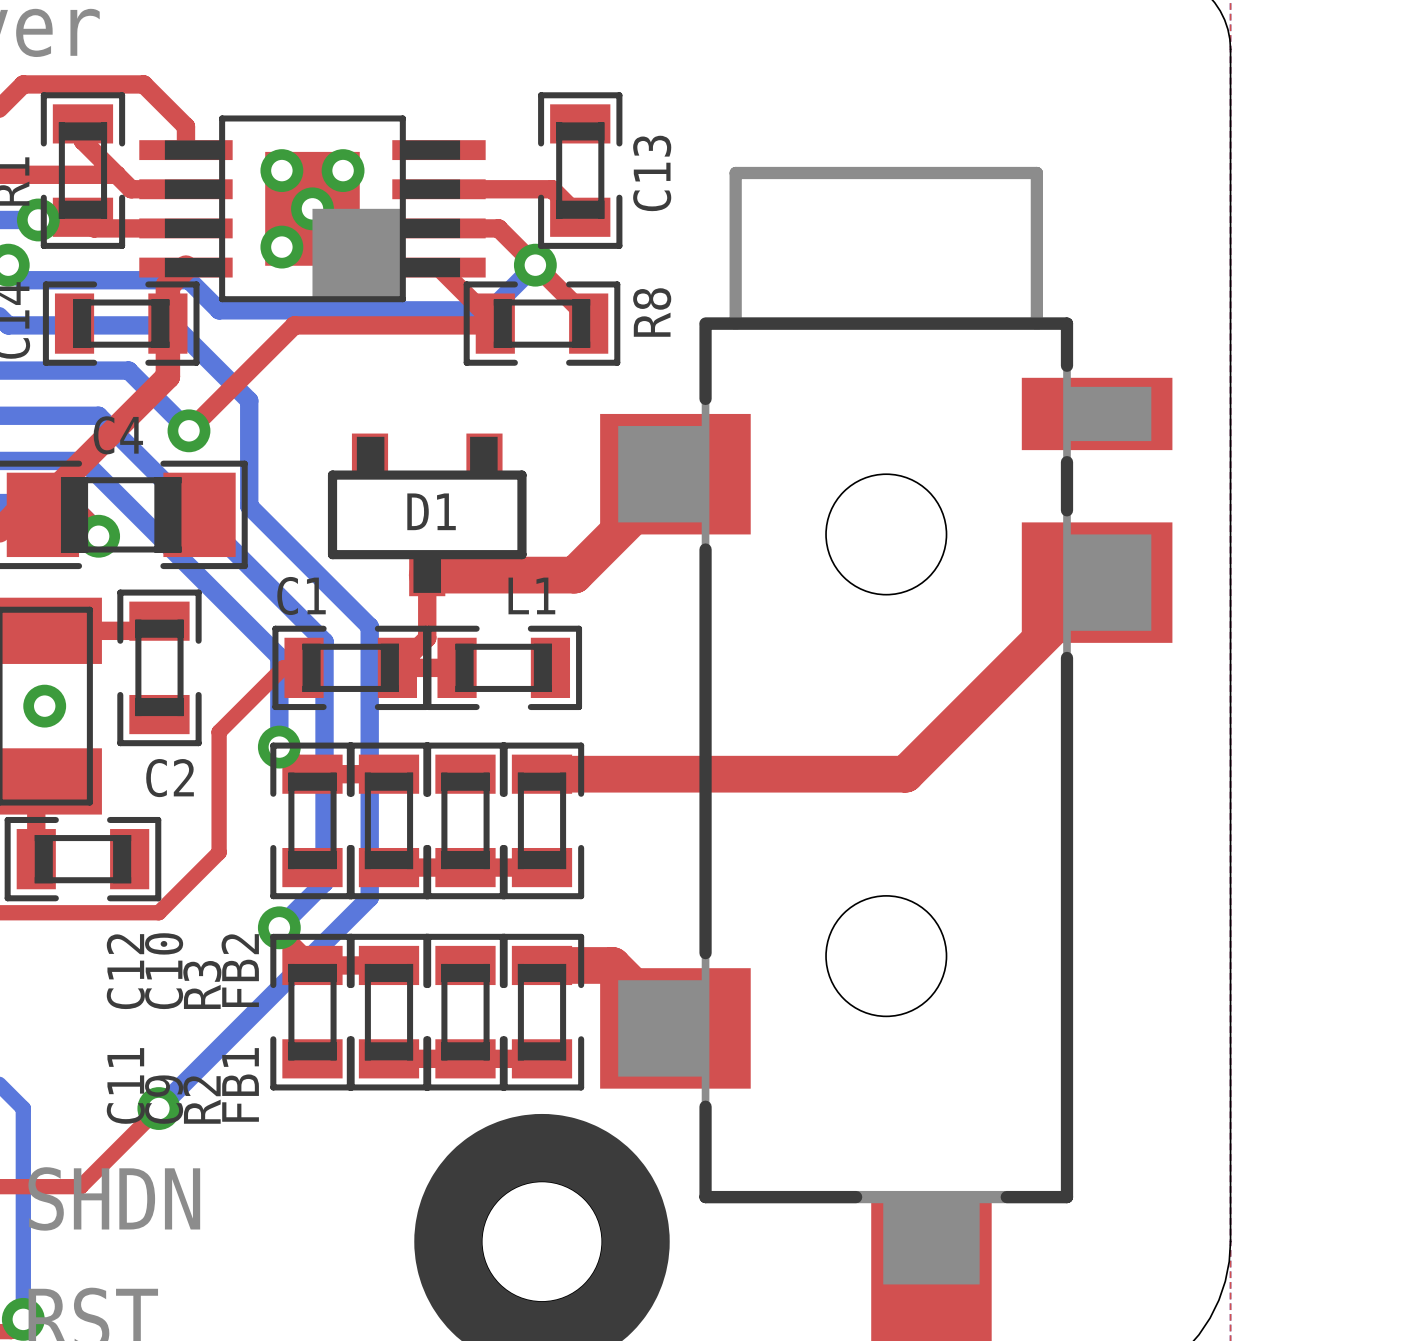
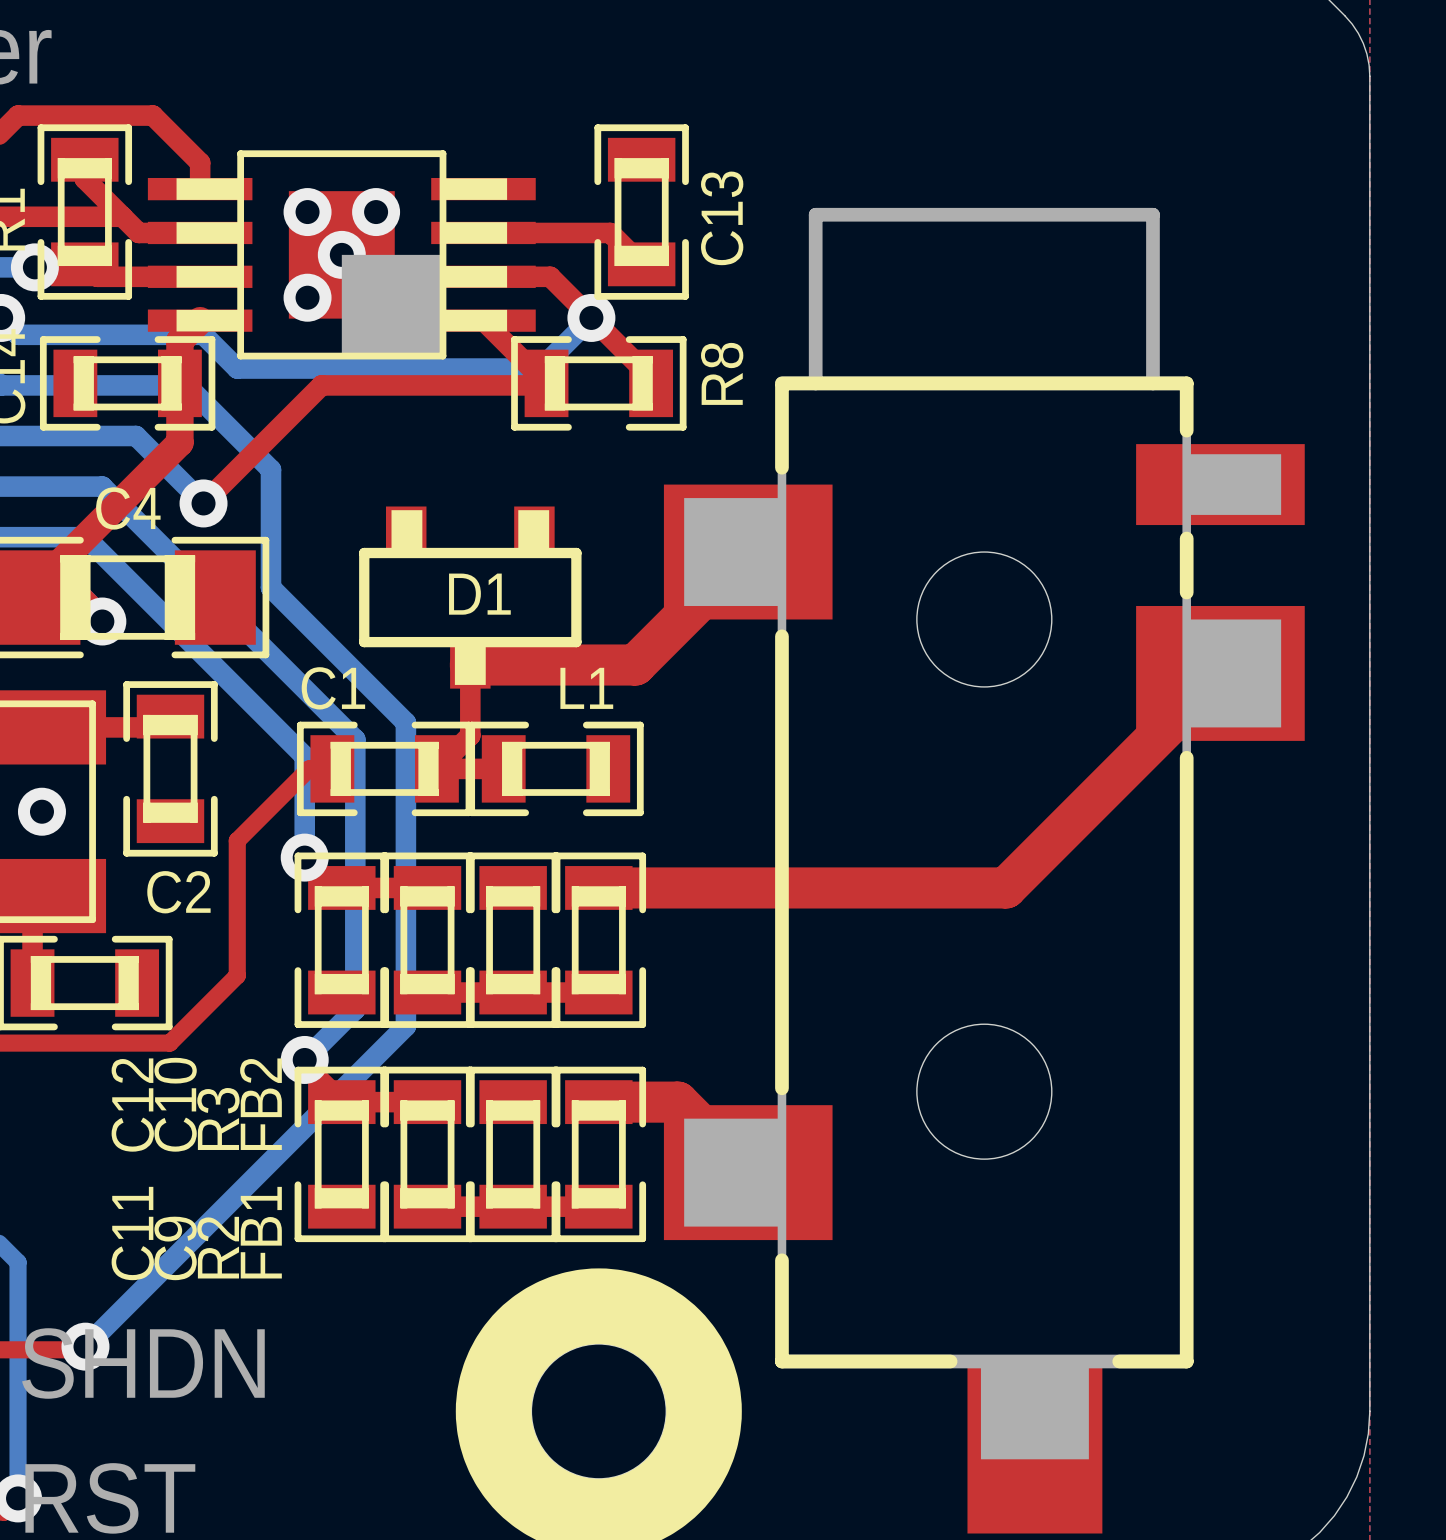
top track: (158, 1108) (83, 1183) -> none
bottom track: none -> (169, 1262) (85, 1346)
via position: (158, 1108) -> (85, 1346)

